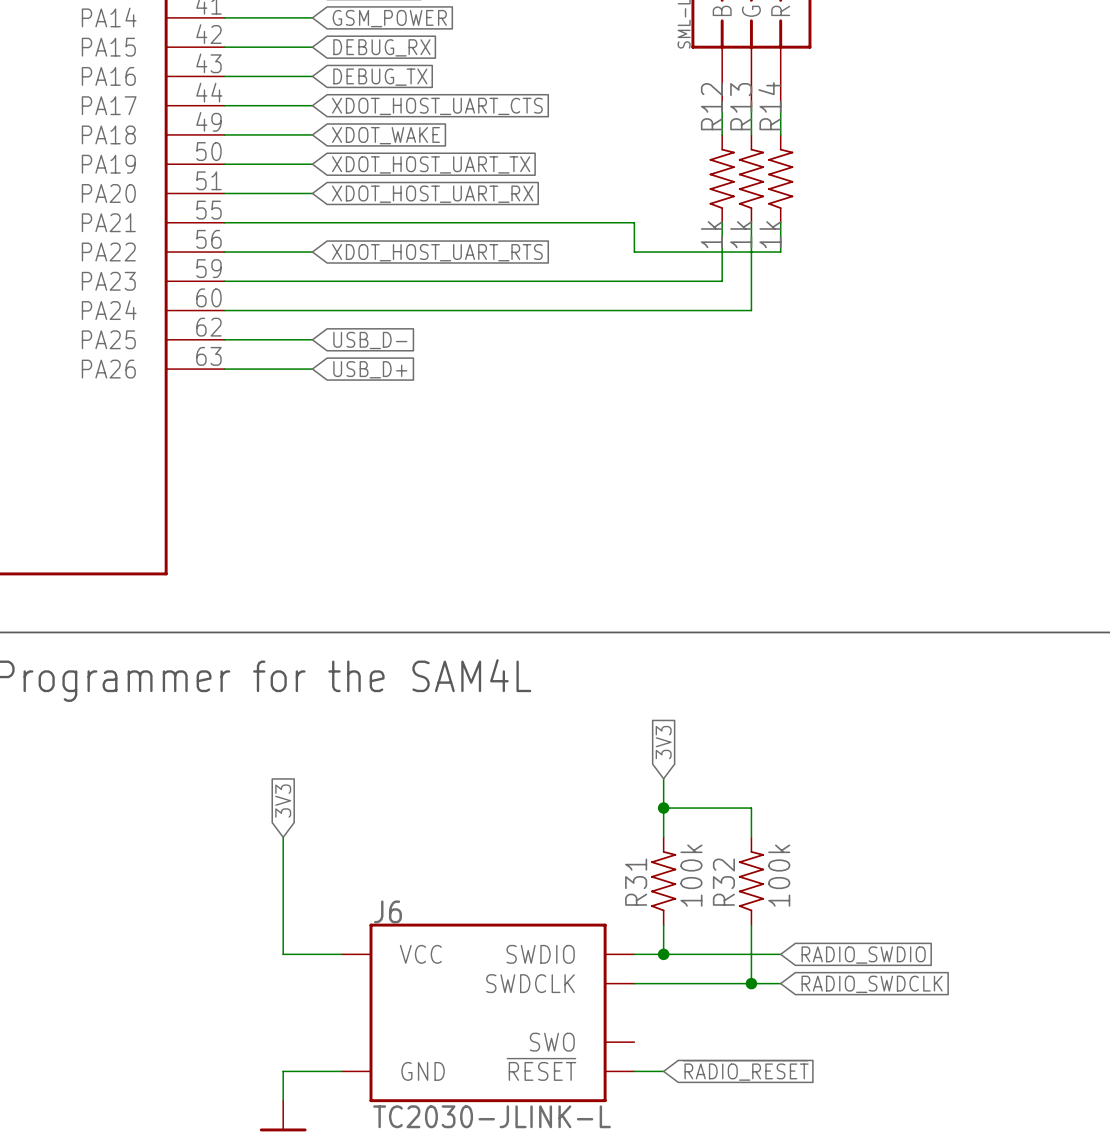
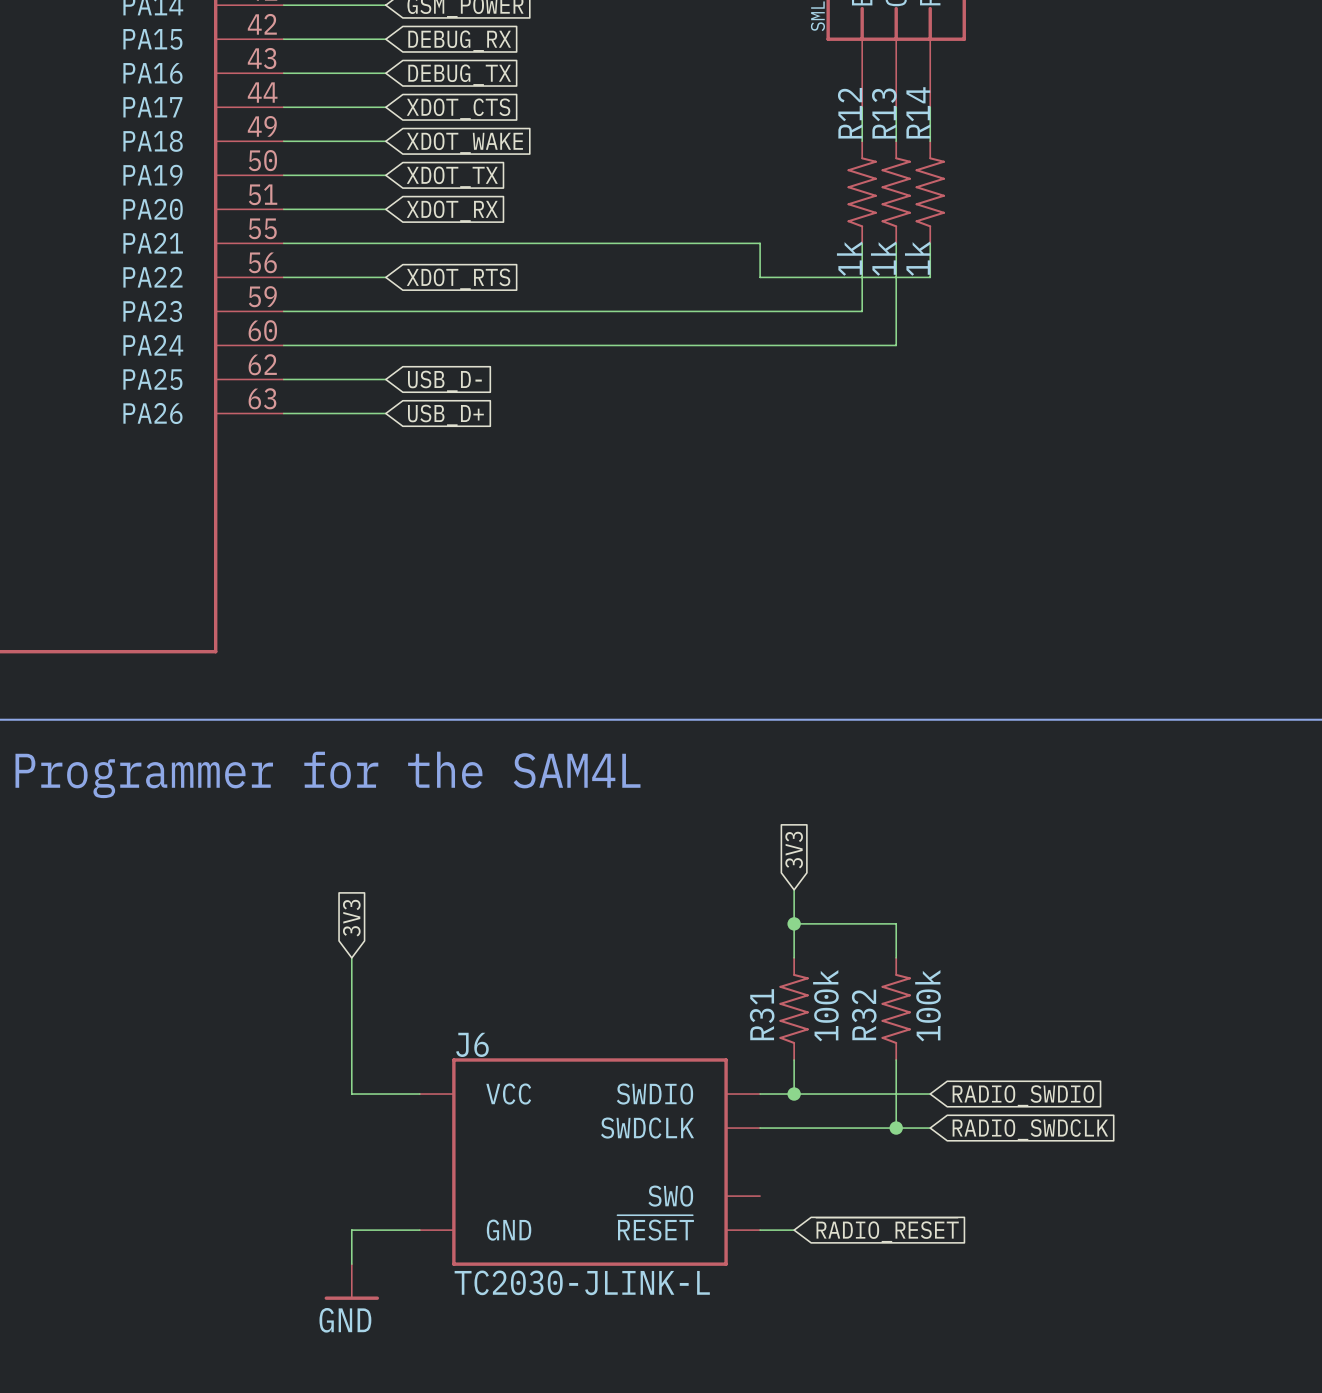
global label: XDOT_HOST_UART_CTS (437, 106) -> XDOT_CTS (458, 109)
global label: XDOT_HOST_UART_TX (431, 164) -> XDOT_TX (452, 177)
global label: XDOT_HOST_UART_RX (432, 194) -> XDOT_RX (452, 211)
global label: XDOT_HOST_UART_RTS (437, 252) -> XDOT_RTS (458, 279)

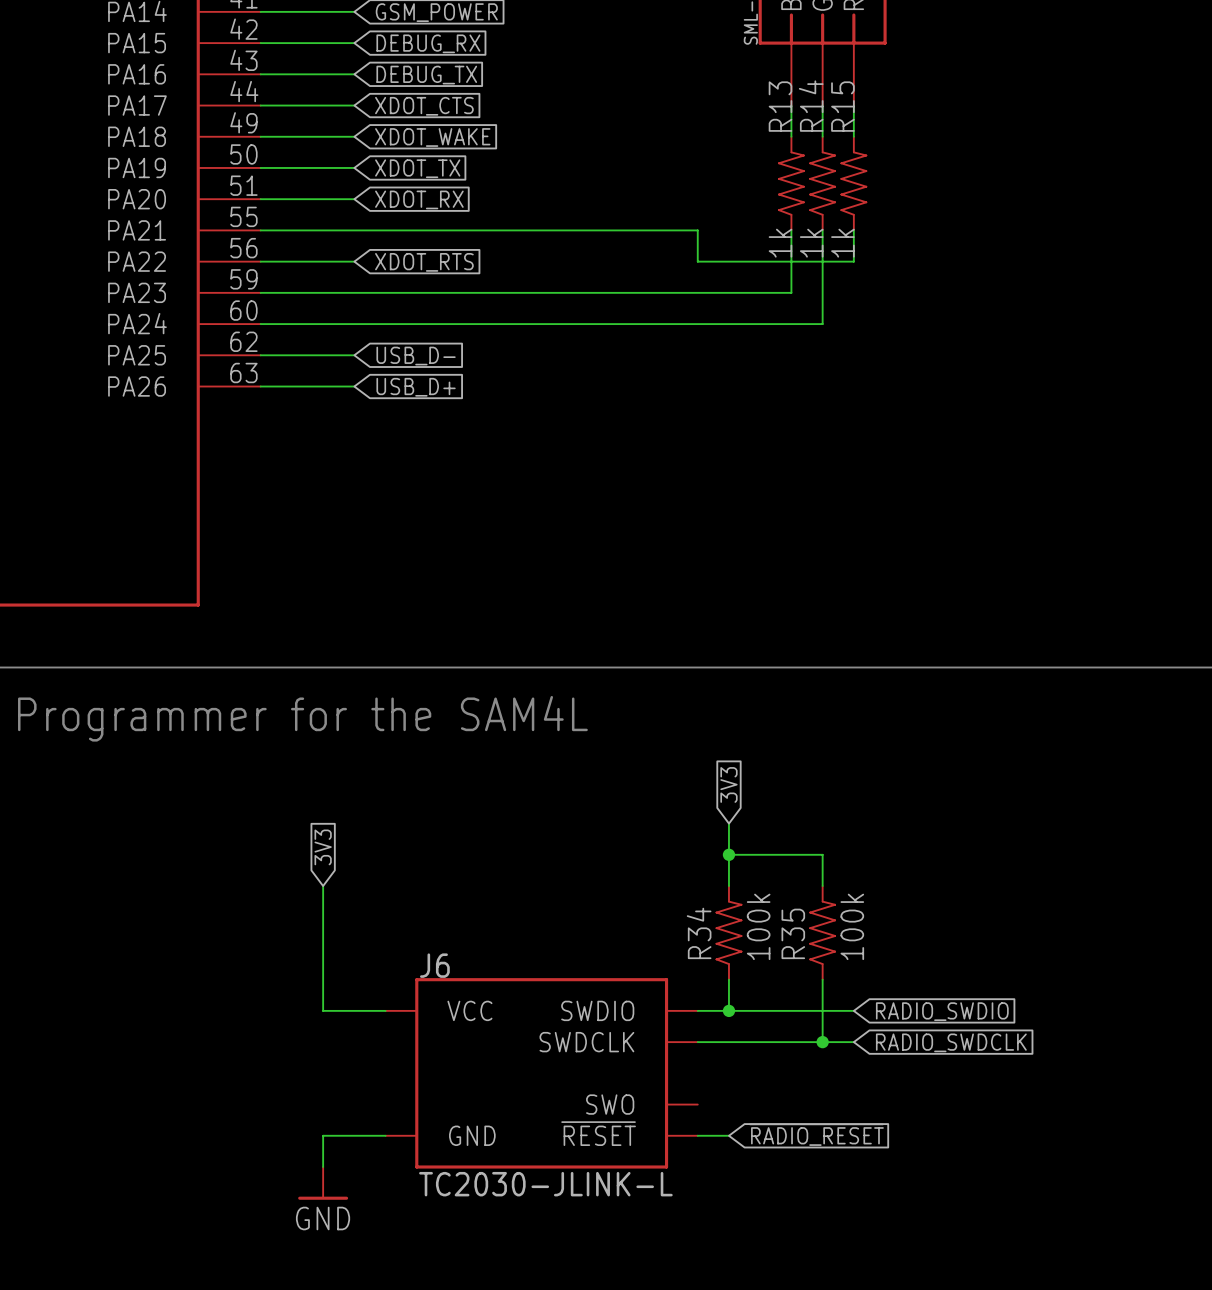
R14 name: R14 (918, 112) -> R15 (842, 106)
R12 name: R12 (850, 113) -> R13 (780, 106)
R13 name: R13 (884, 113) -> R14 (811, 106)
R31 name: R31 (762, 1014) -> R34 (699, 933)
R32 name: R32 (864, 1014) -> R35 (793, 933)

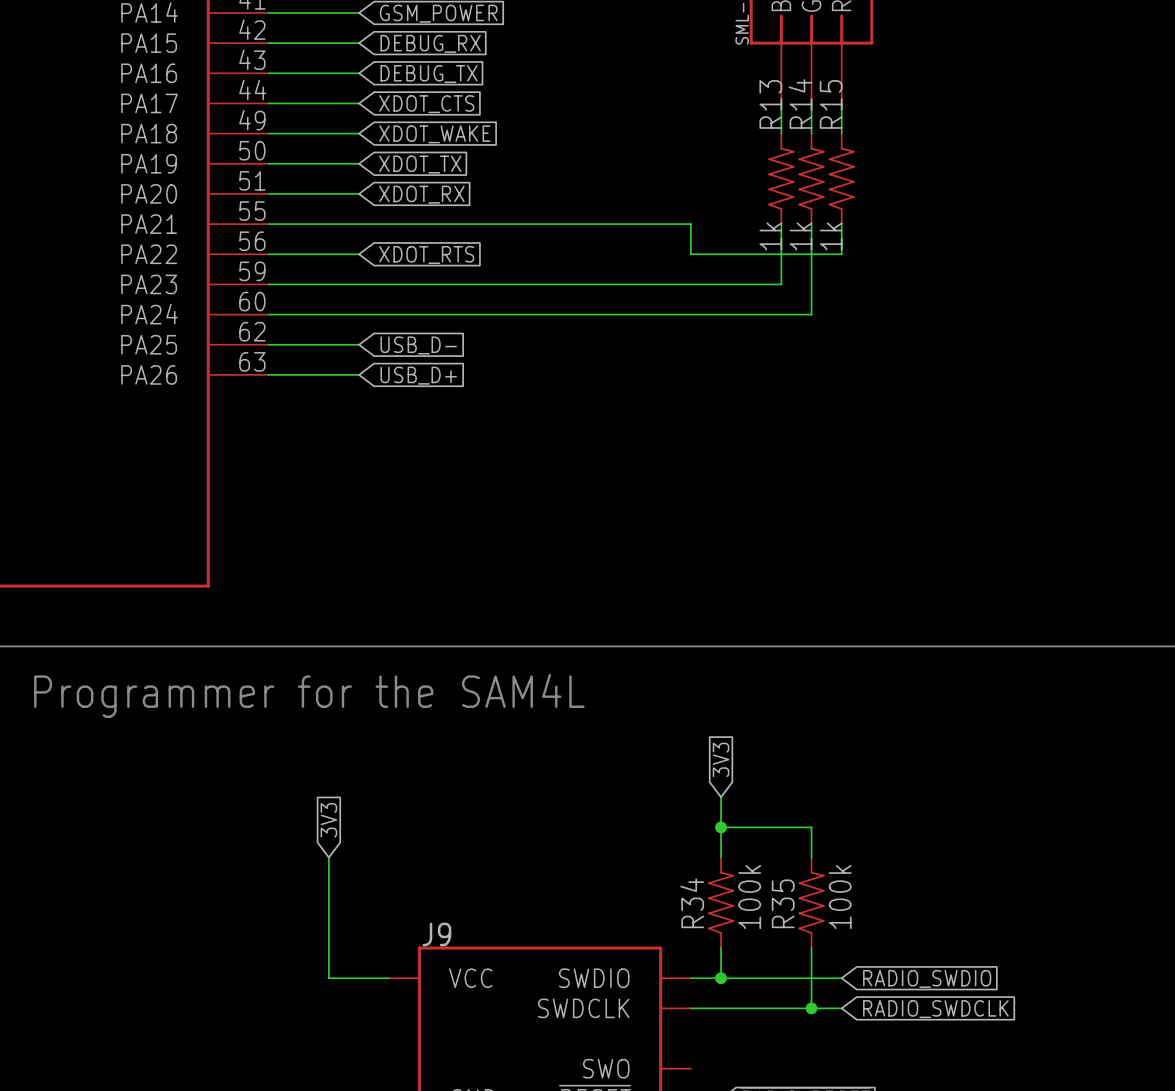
J6 name: J6 (434, 965) -> J9 (436, 934)

